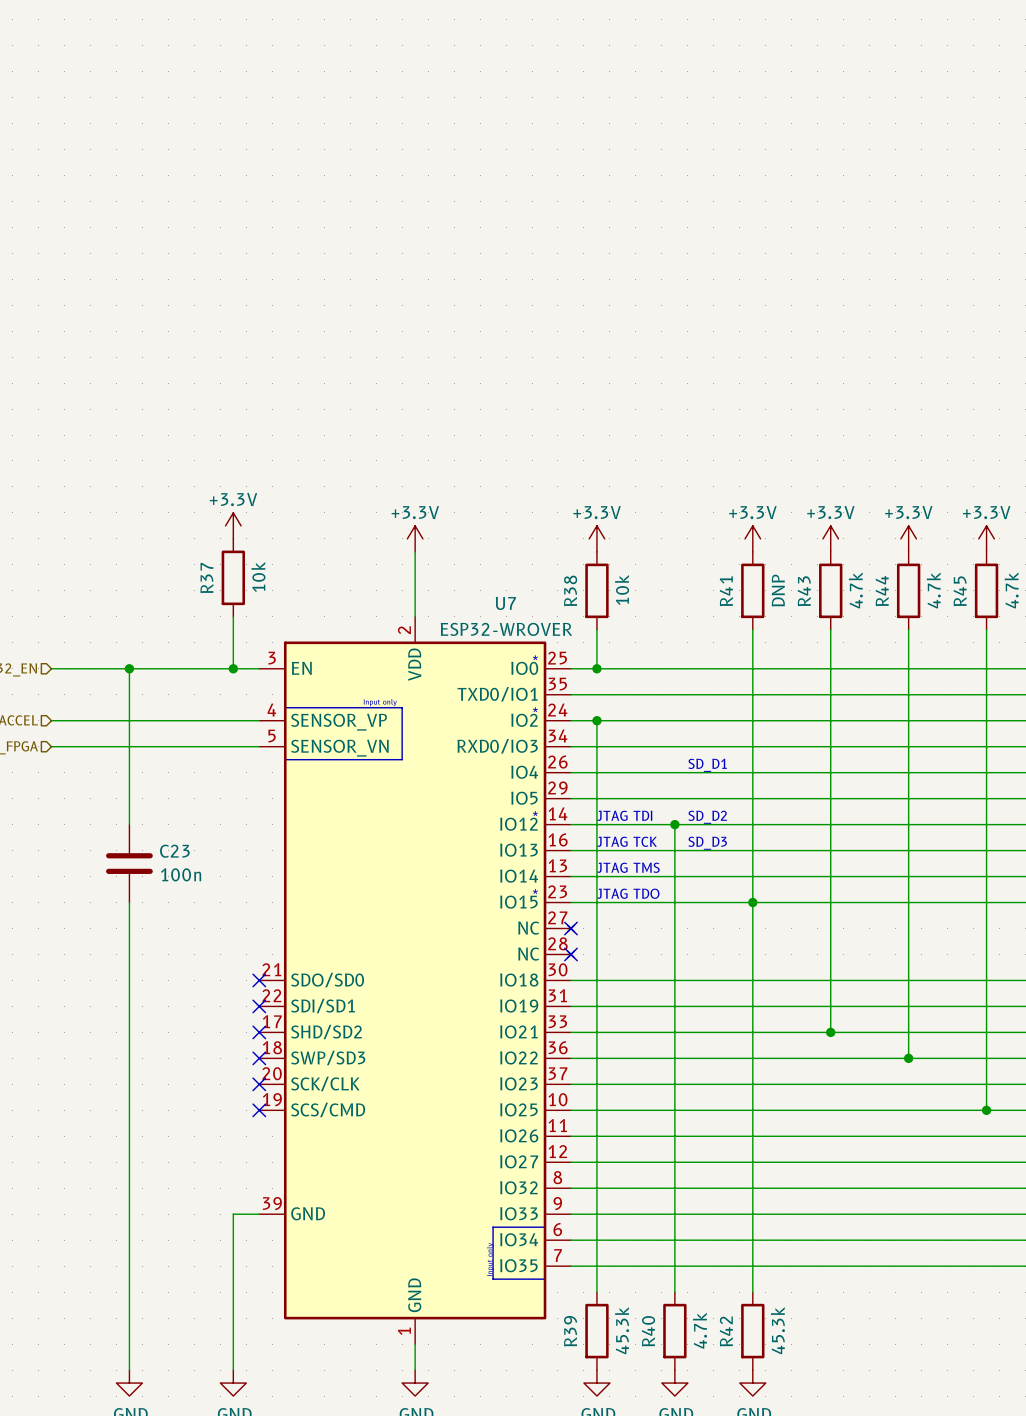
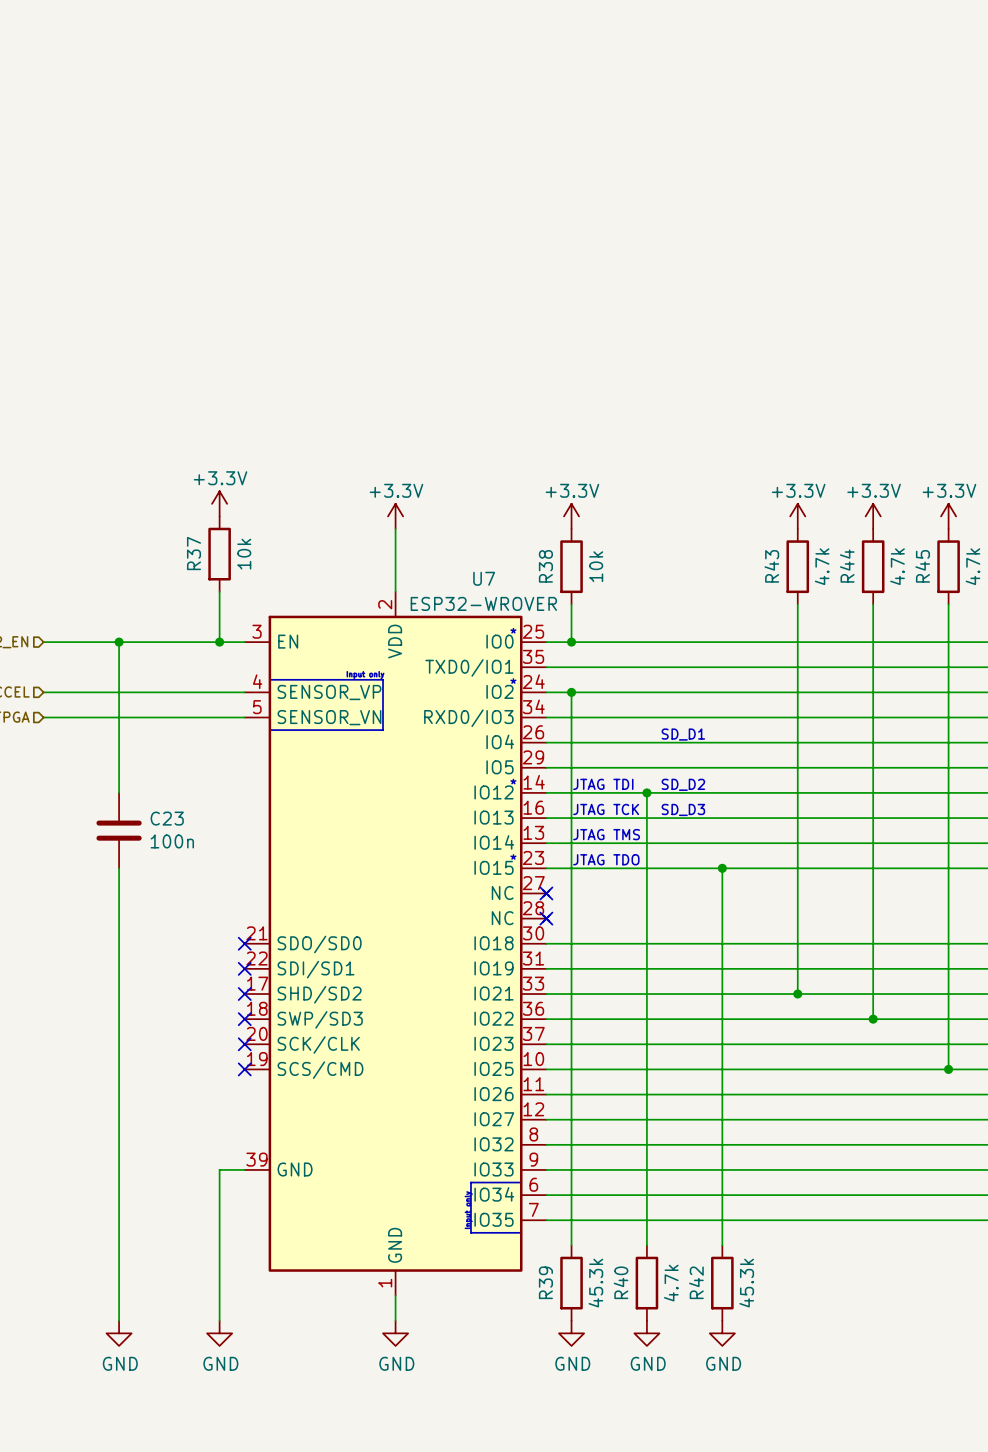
power symbol: +3.3V (752, 538) -> none
R41: DNP (752, 590) -> none
wire: (752, 629) (752, 902) -> none

